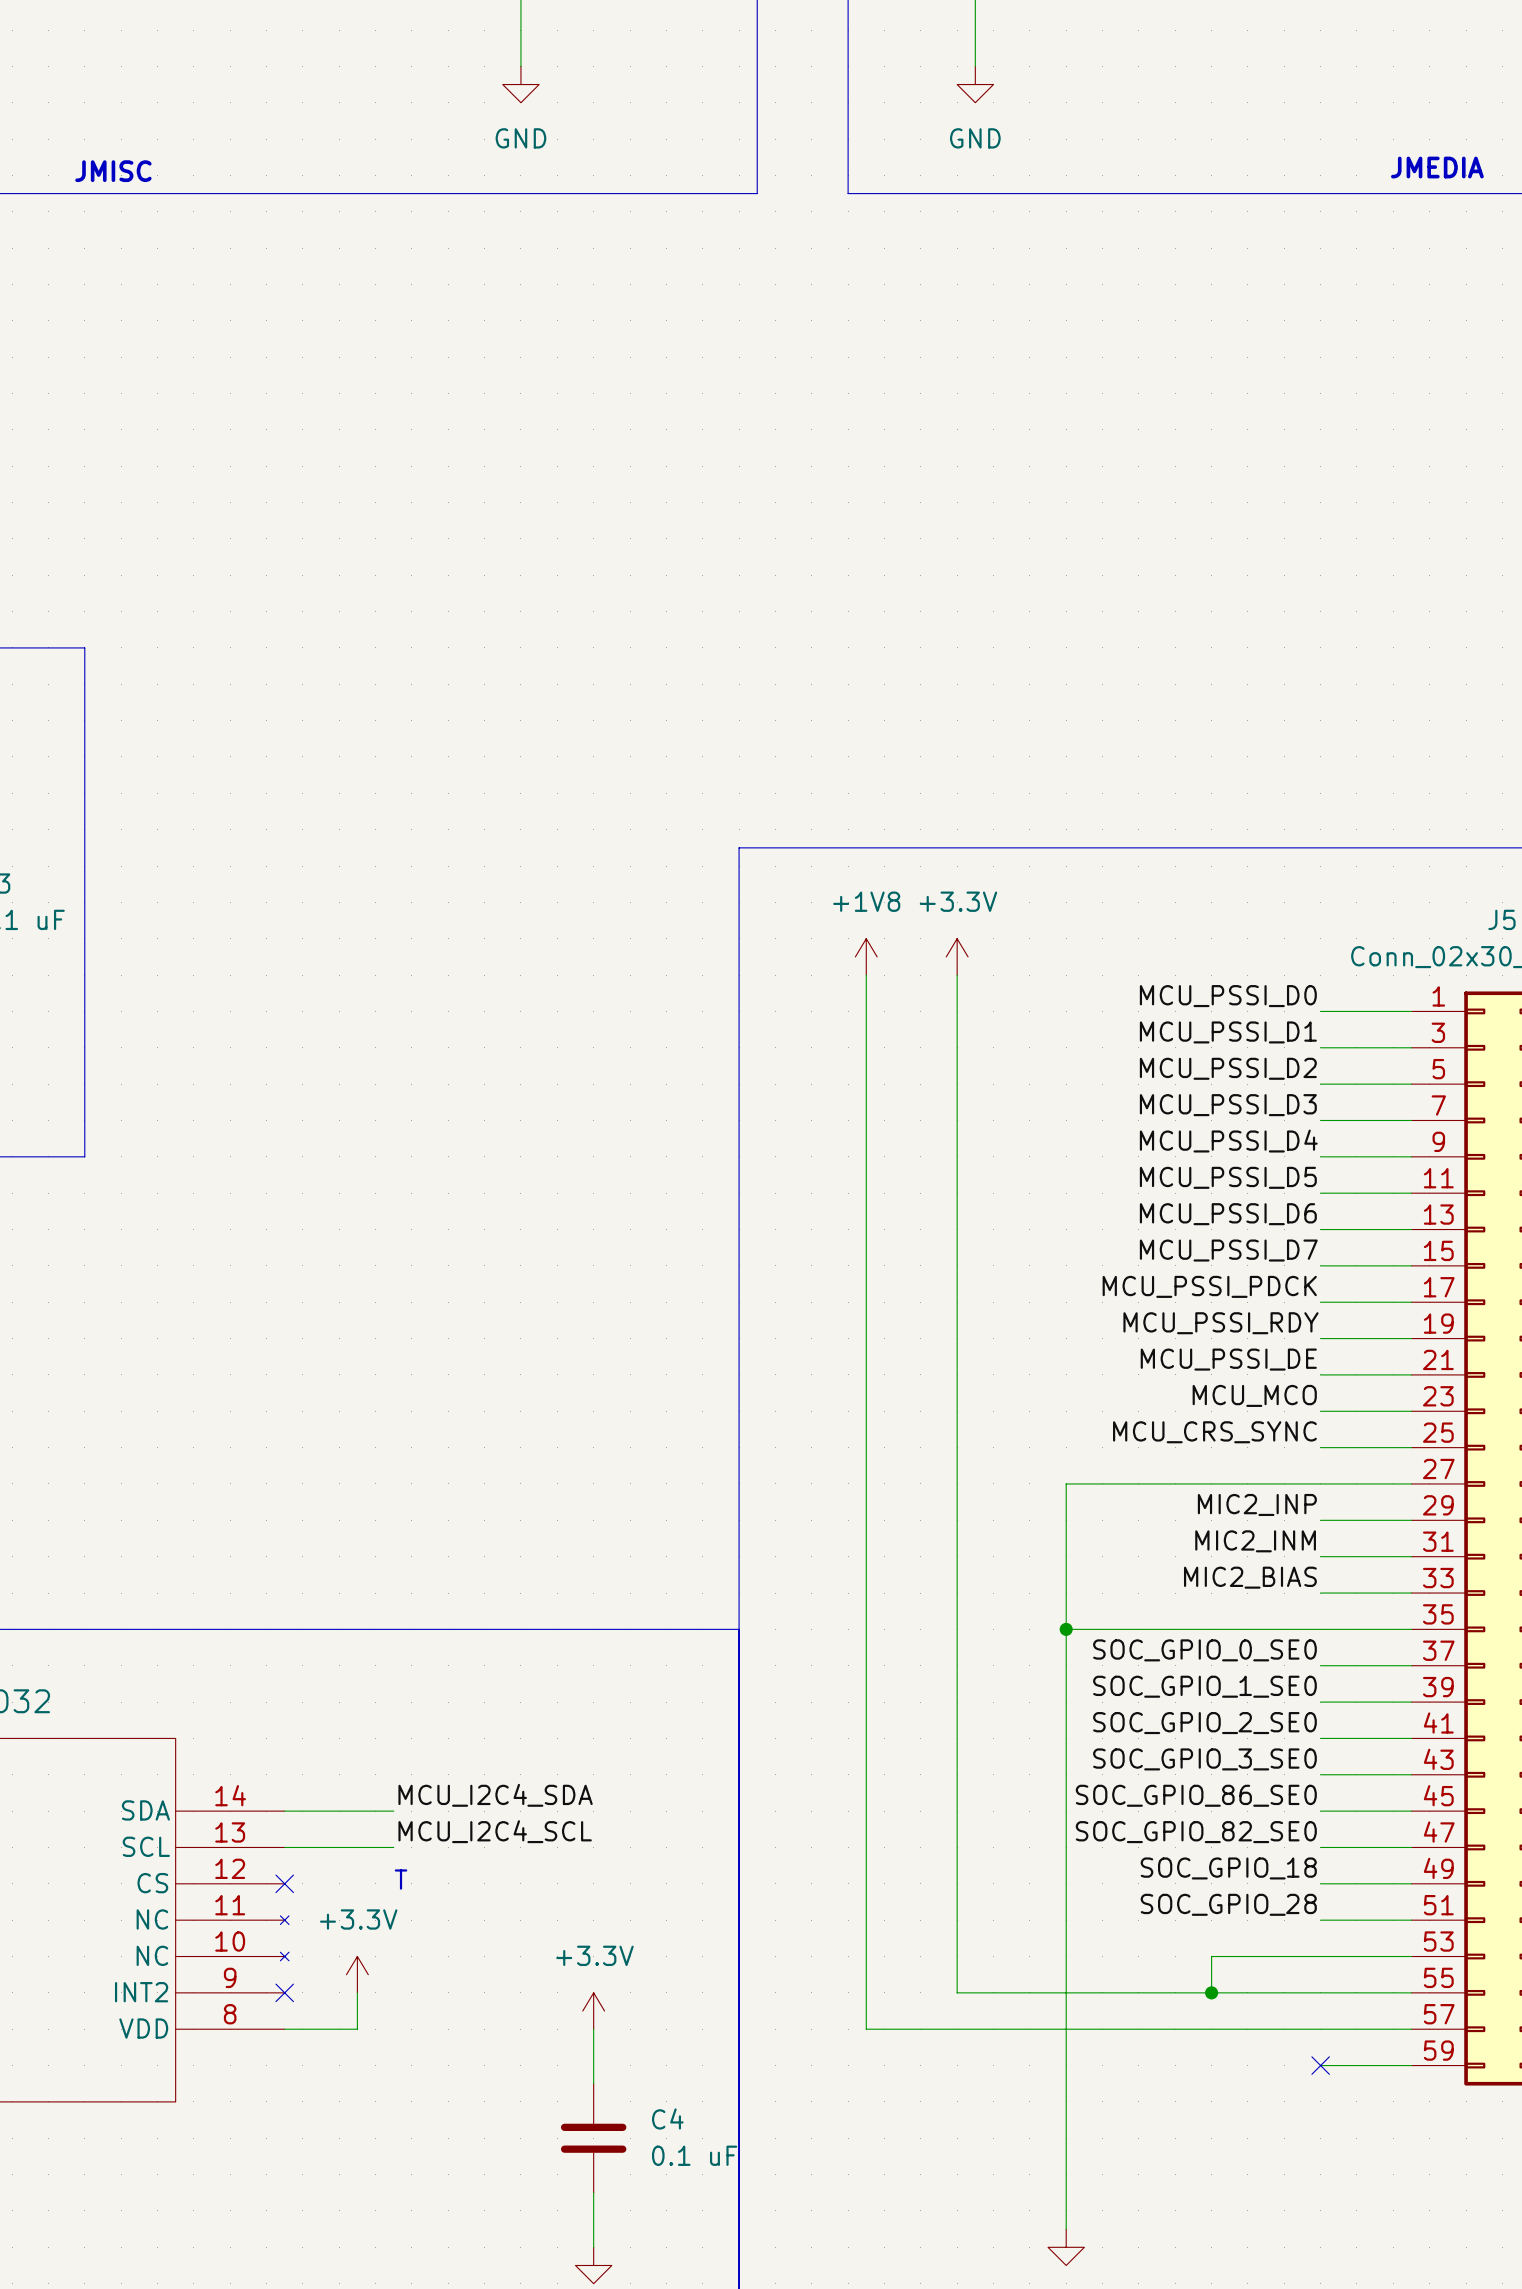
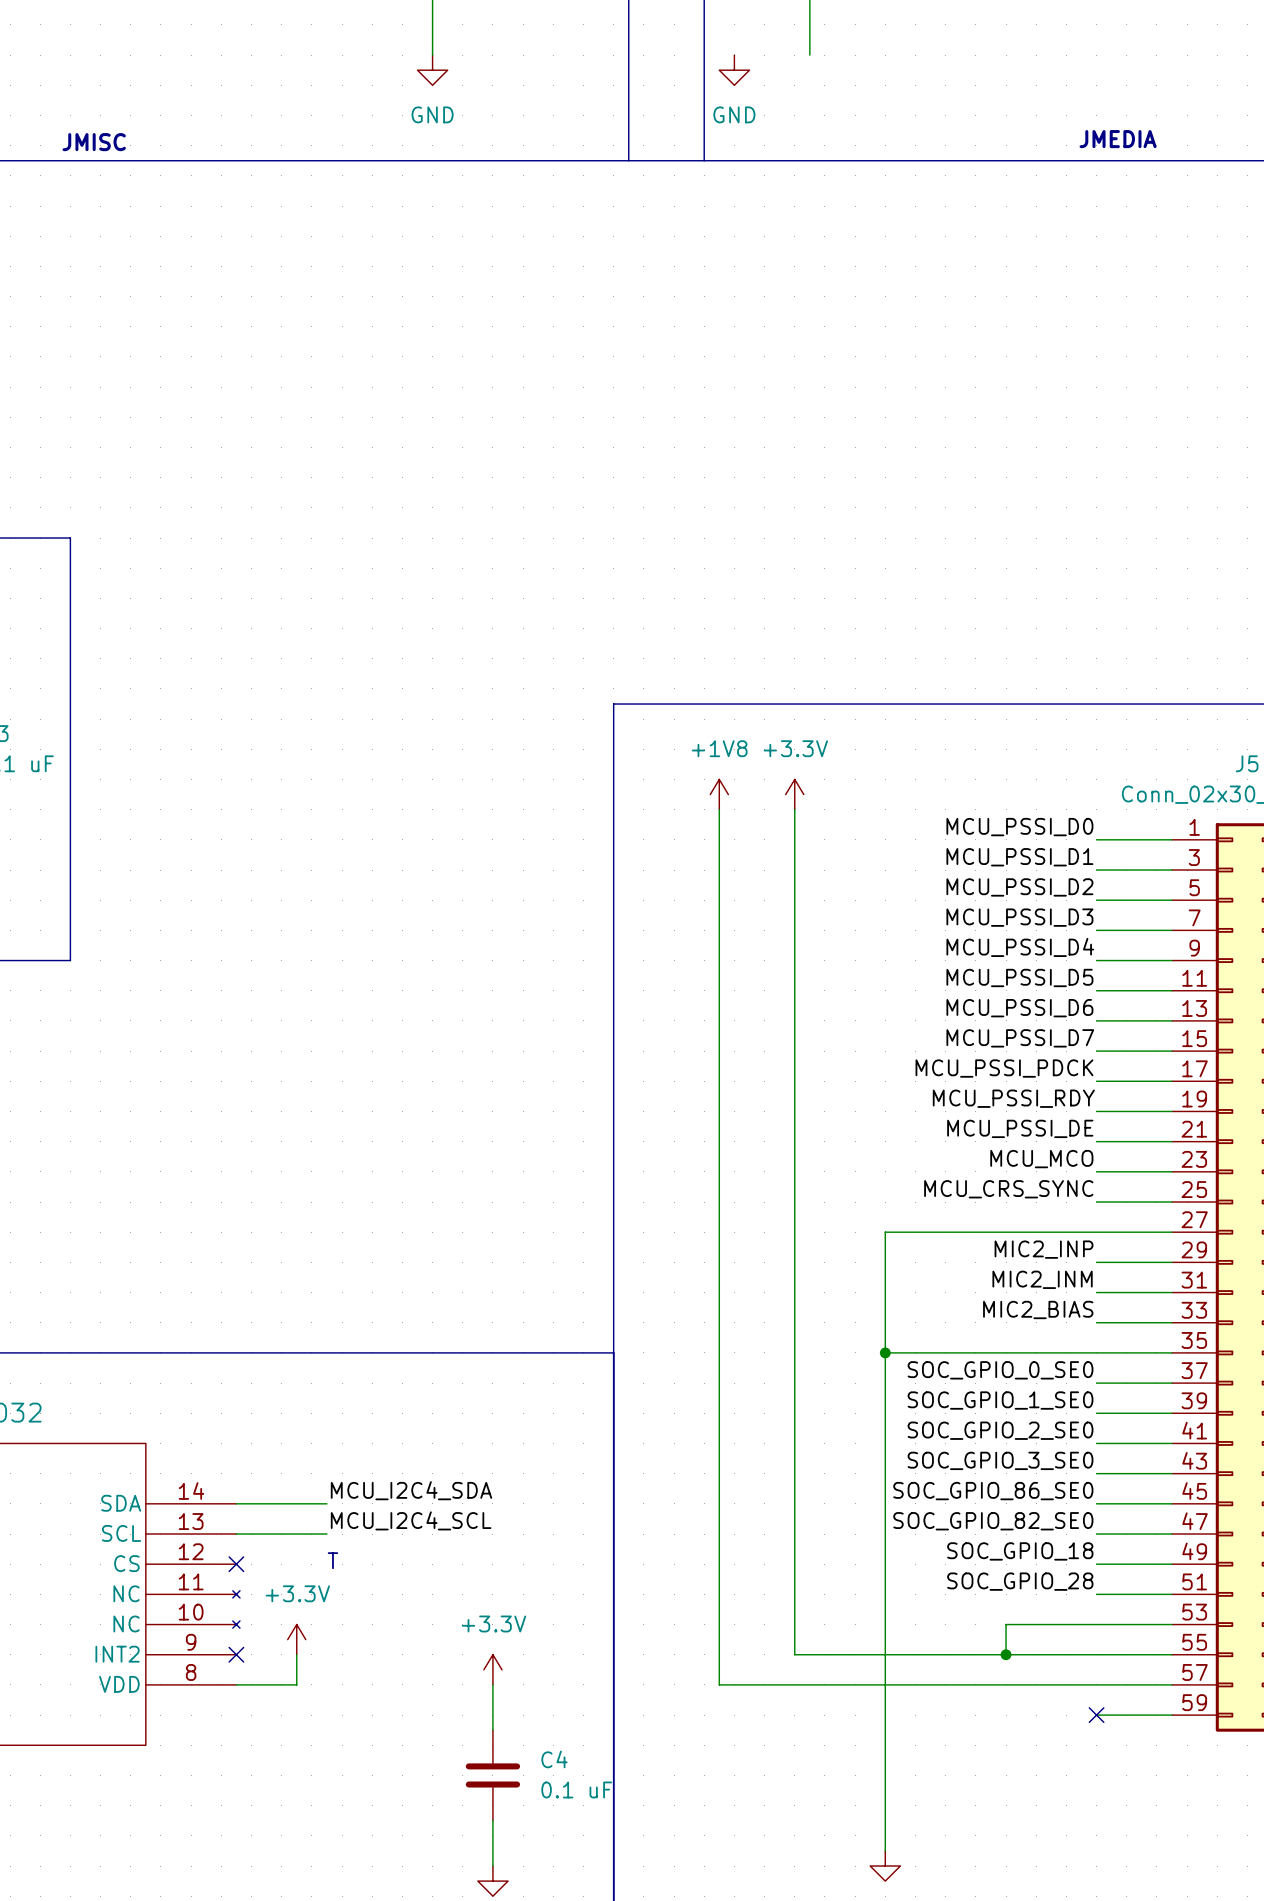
power symbol position: GND (975, 84) -> GND (734, 70)
text position: JMEDIA (1437, 167) -> JMEDIA (1118, 139)
line: none -> (628, 160) (704, 160)

